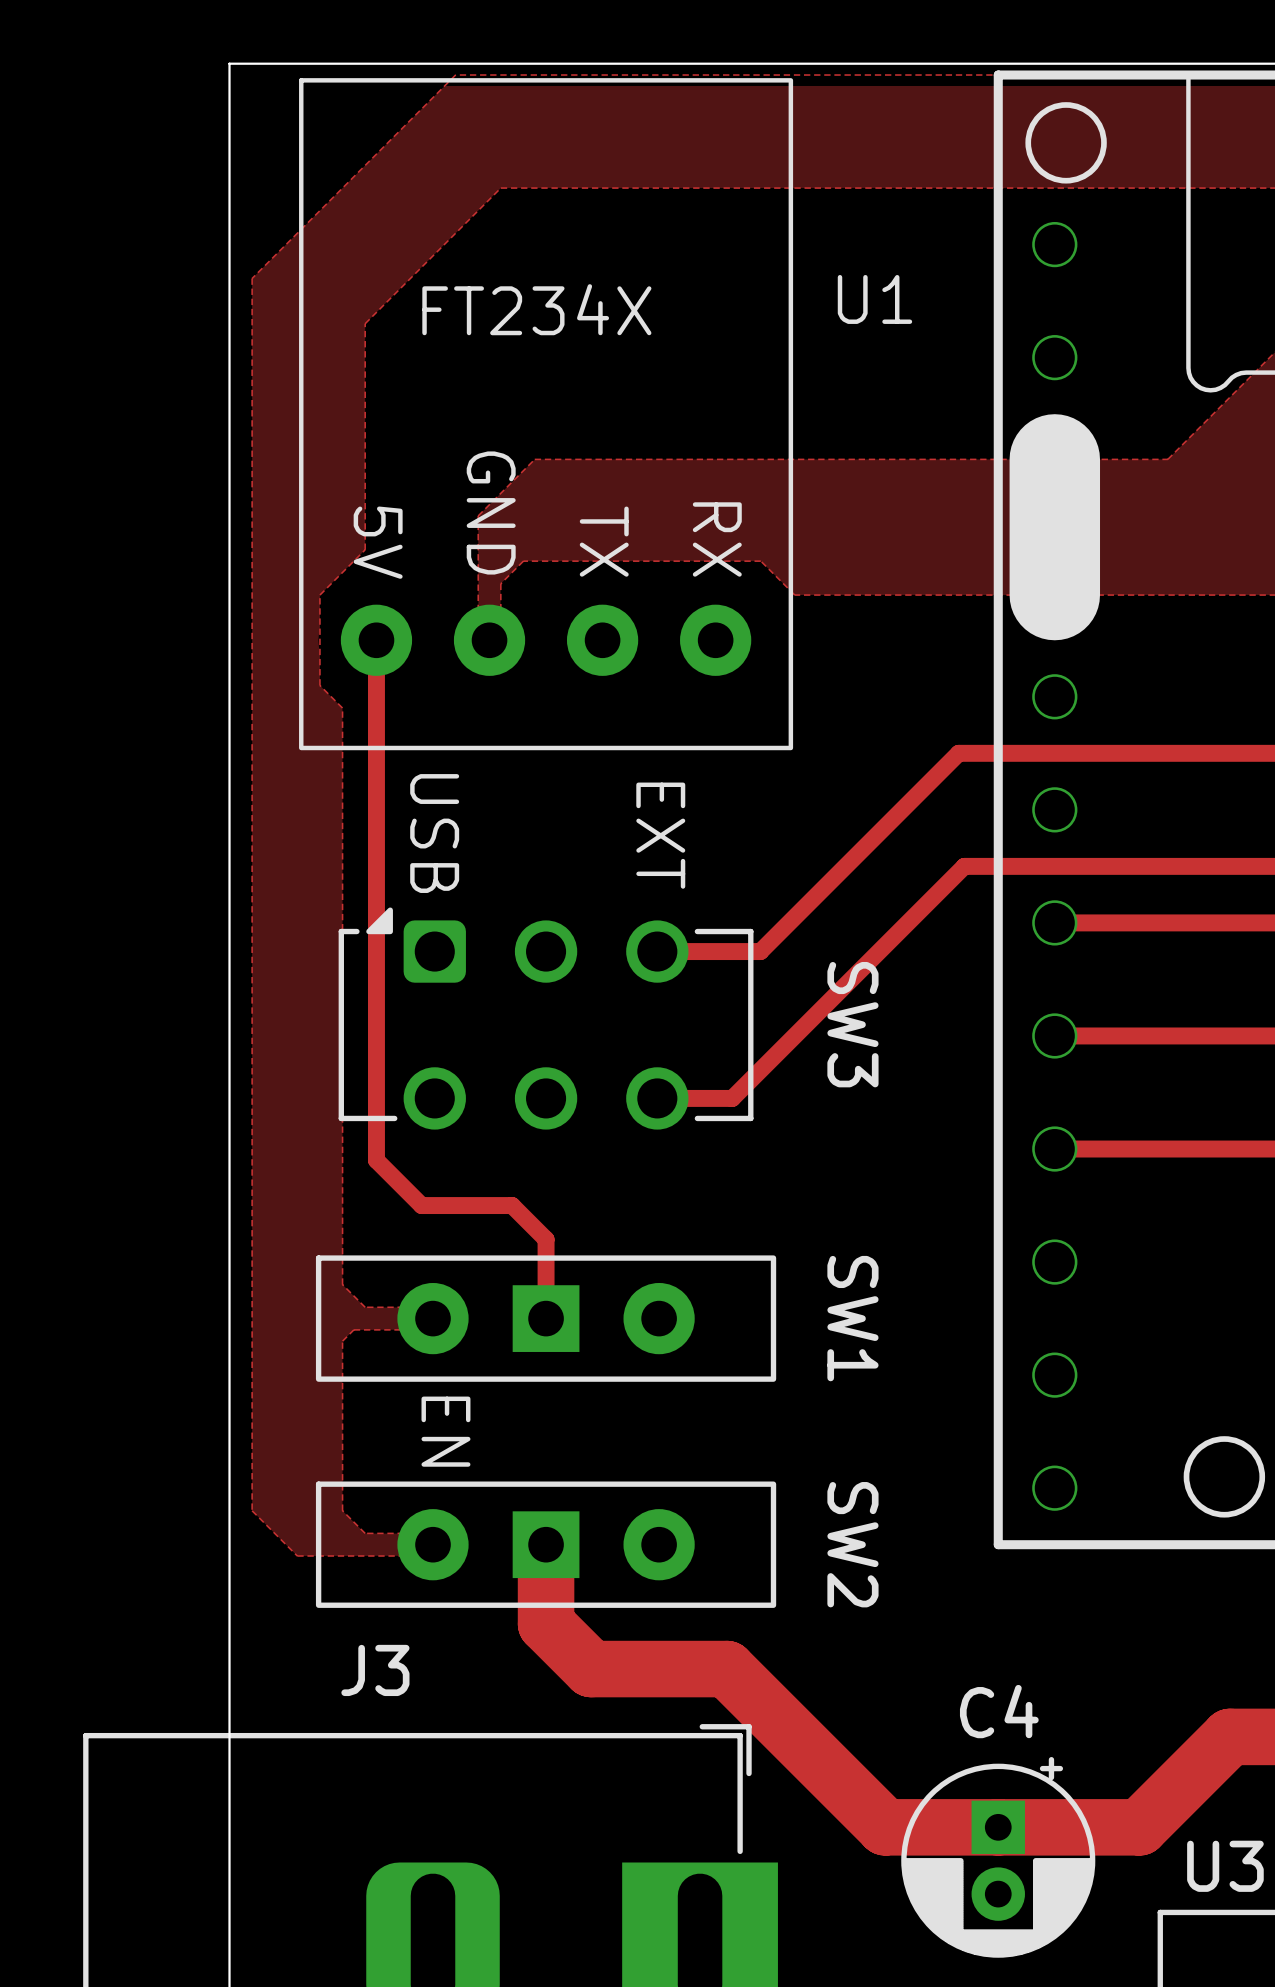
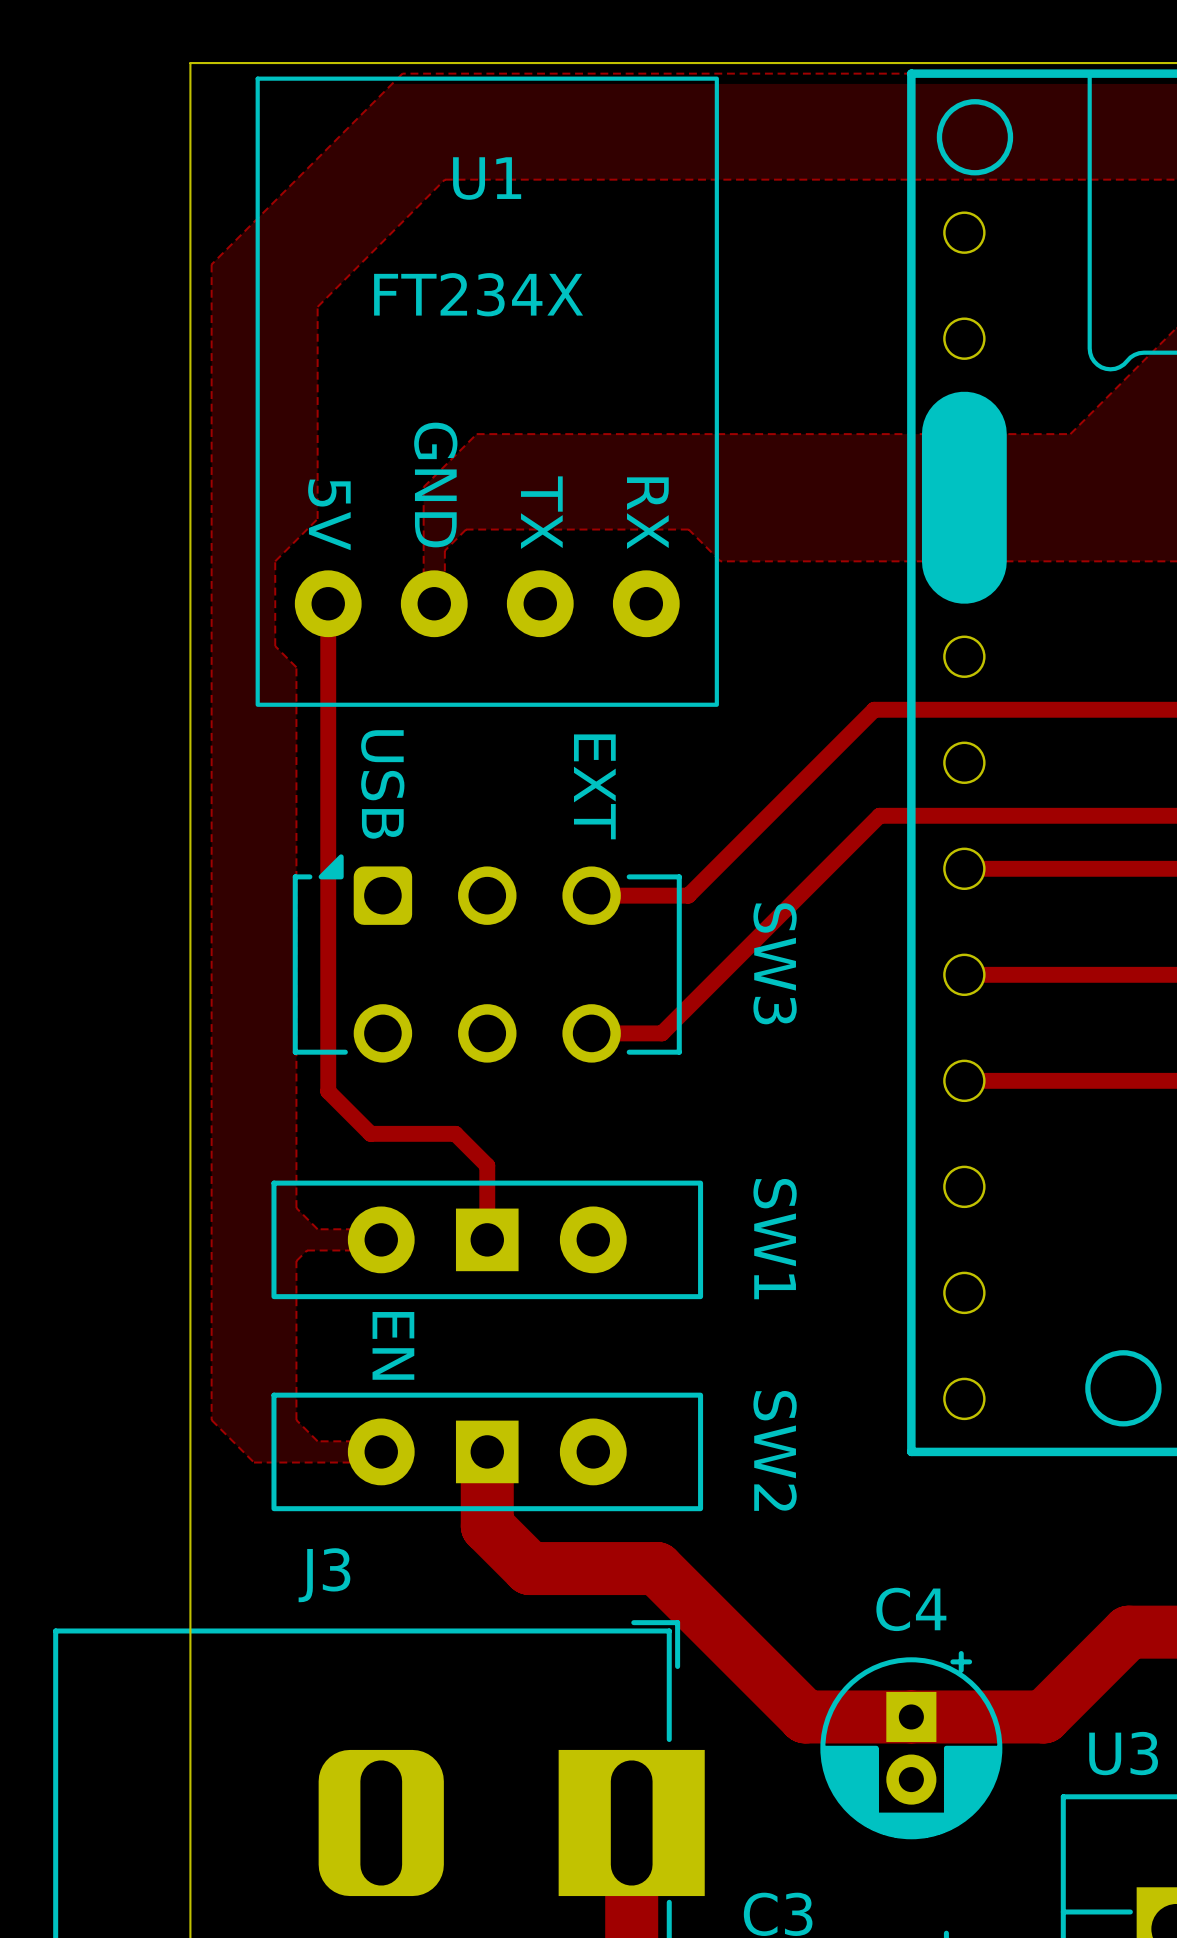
U1 name position: U1 (874, 299) -> U1 (487, 178)

